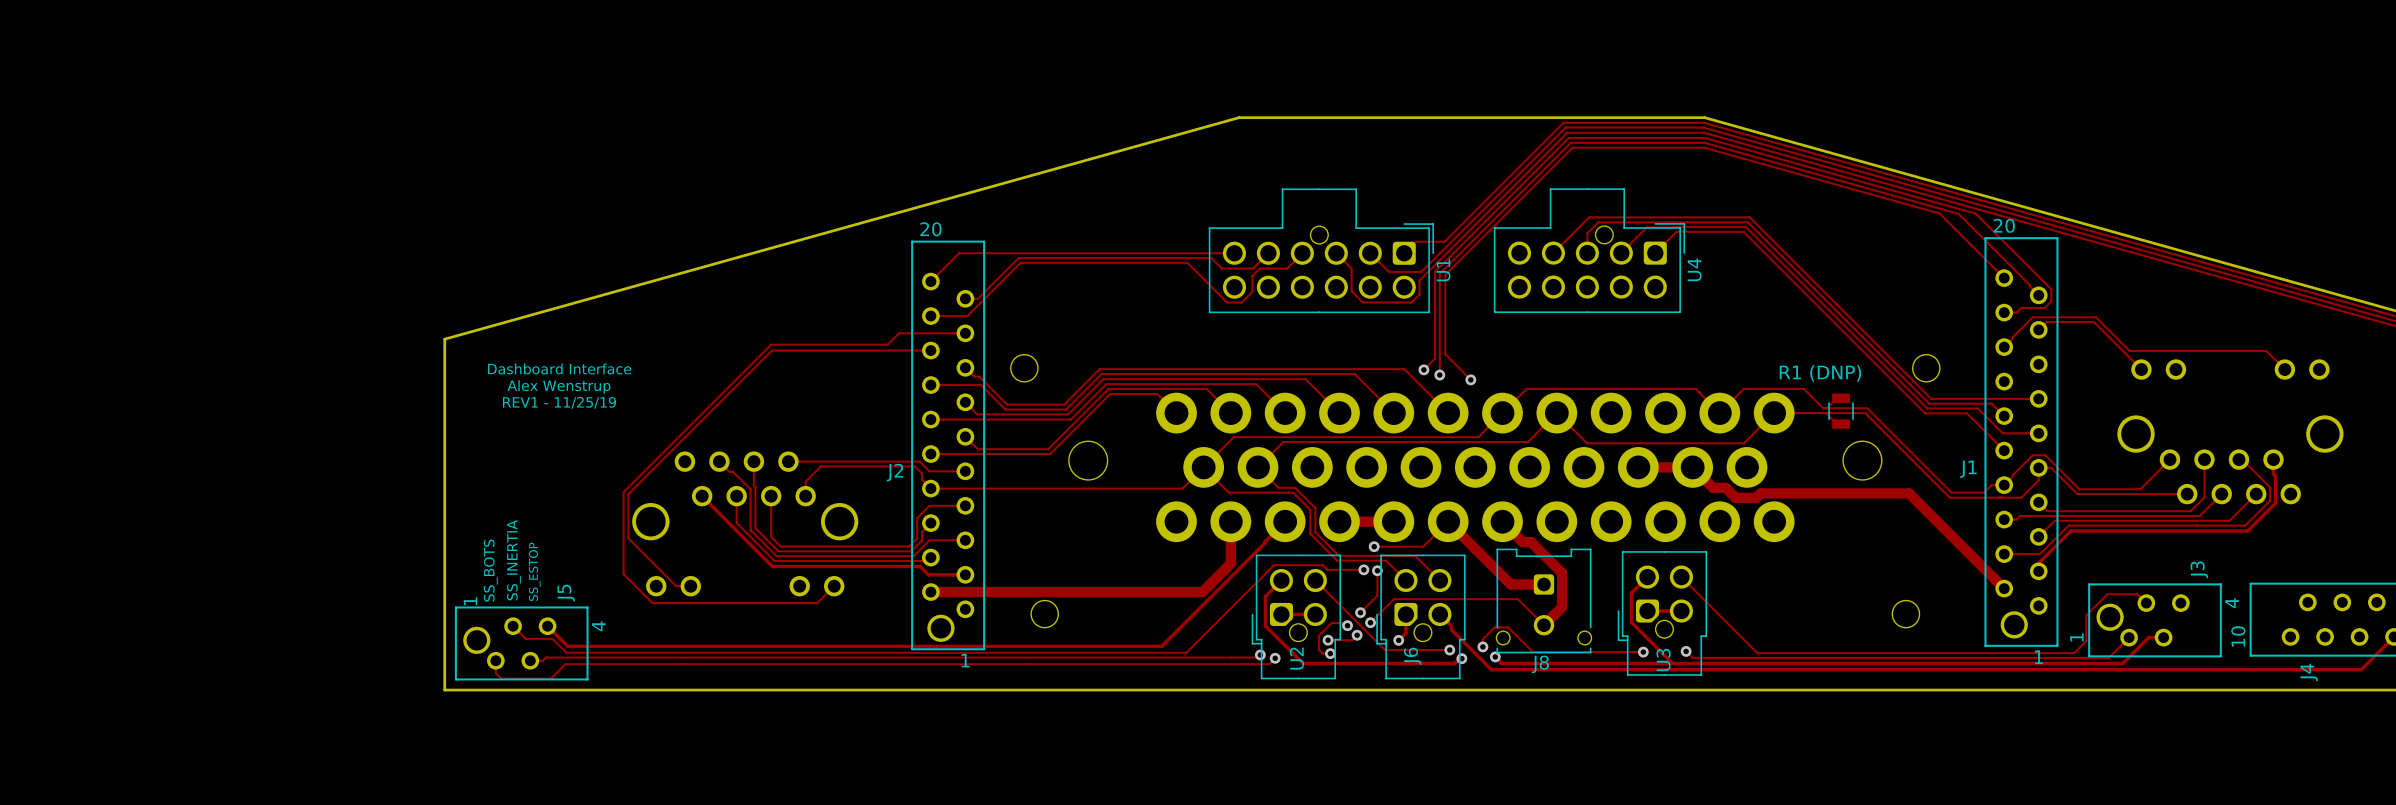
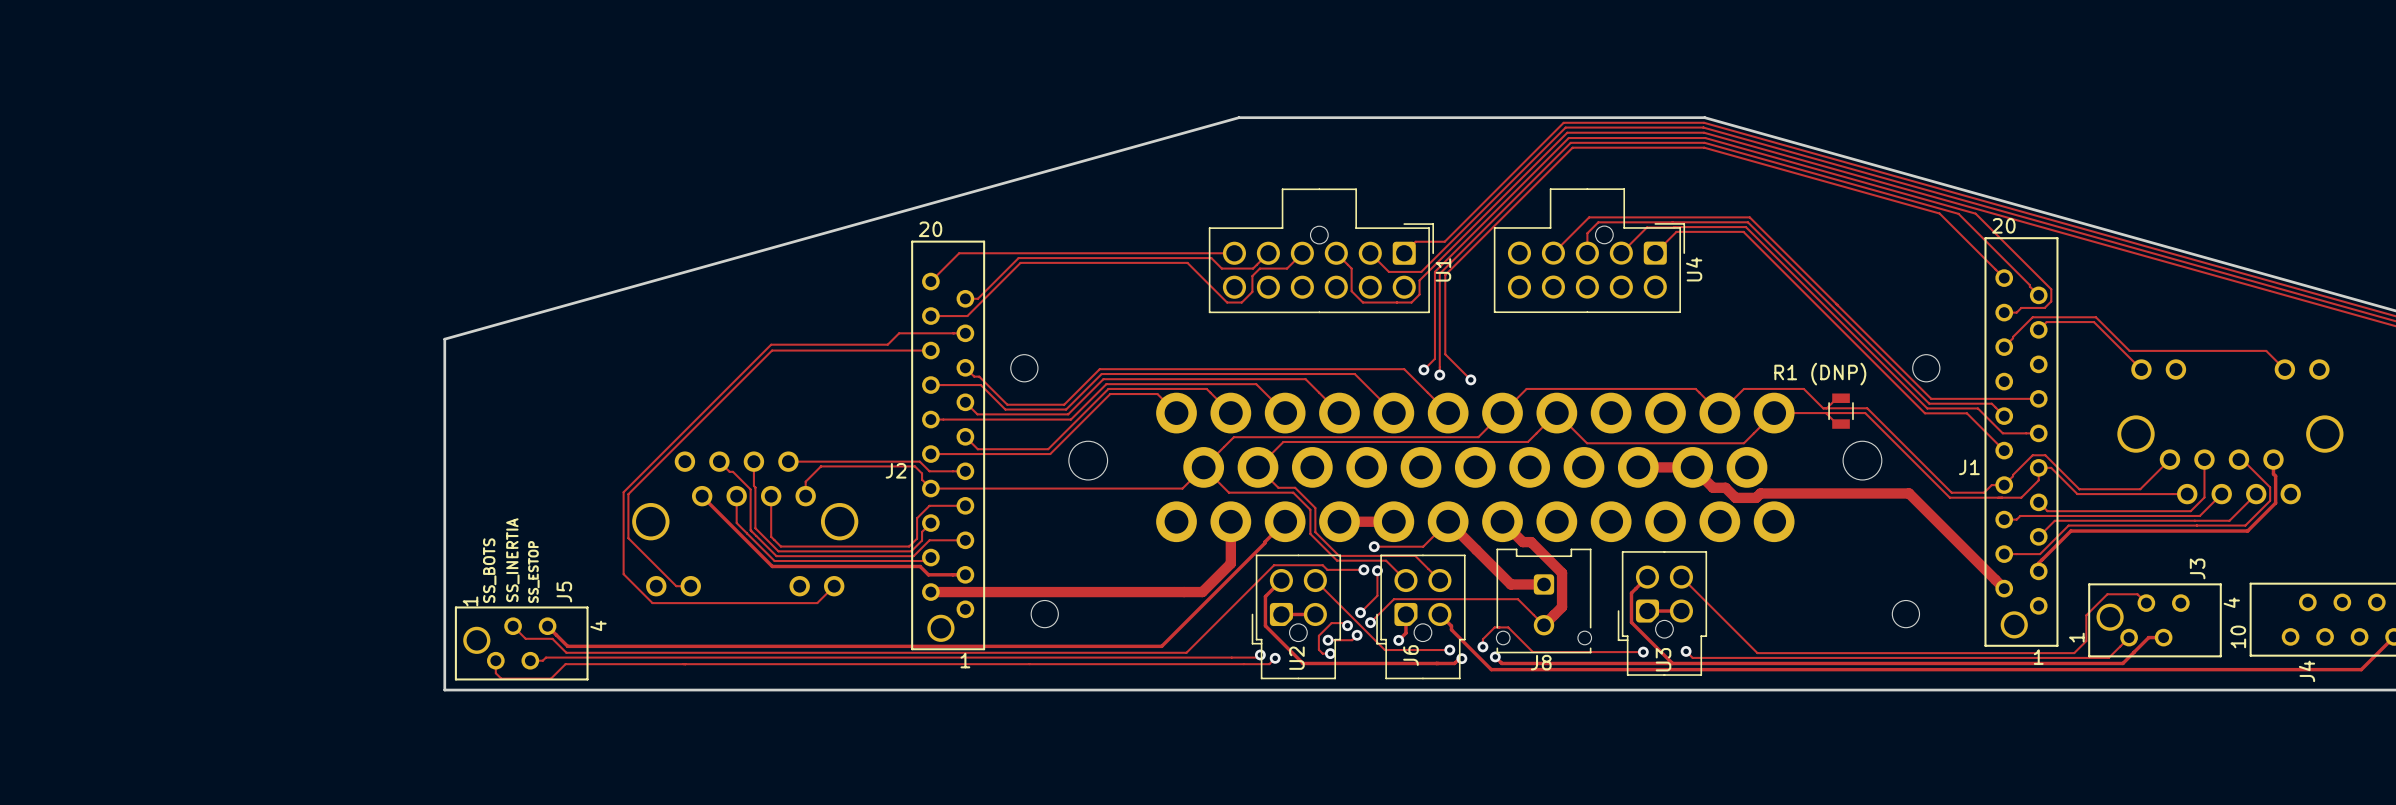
text: Dashboard Interface (559, 368) -> none
text: Alex Wenstrup (558, 386) -> none
text: REV1 - 11/25/19 (559, 402) -> none

